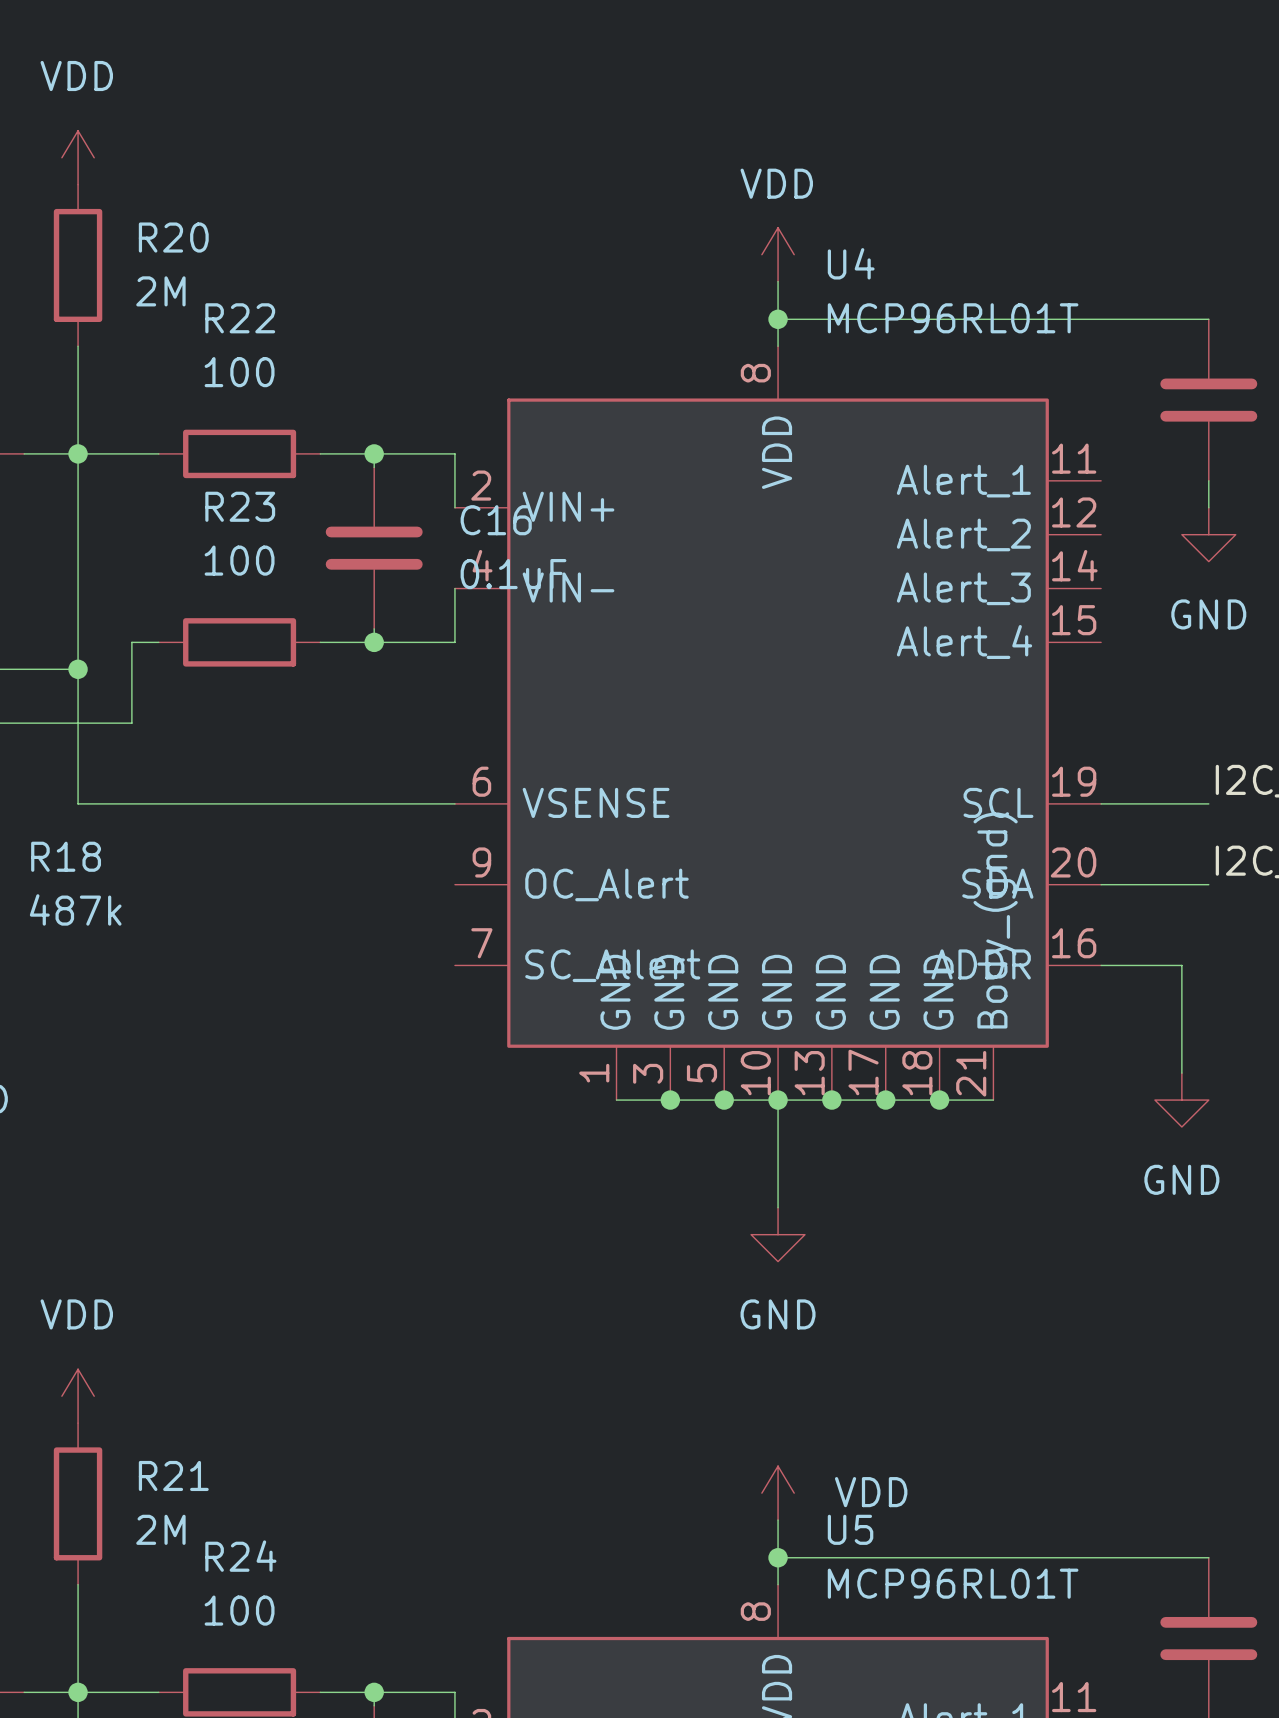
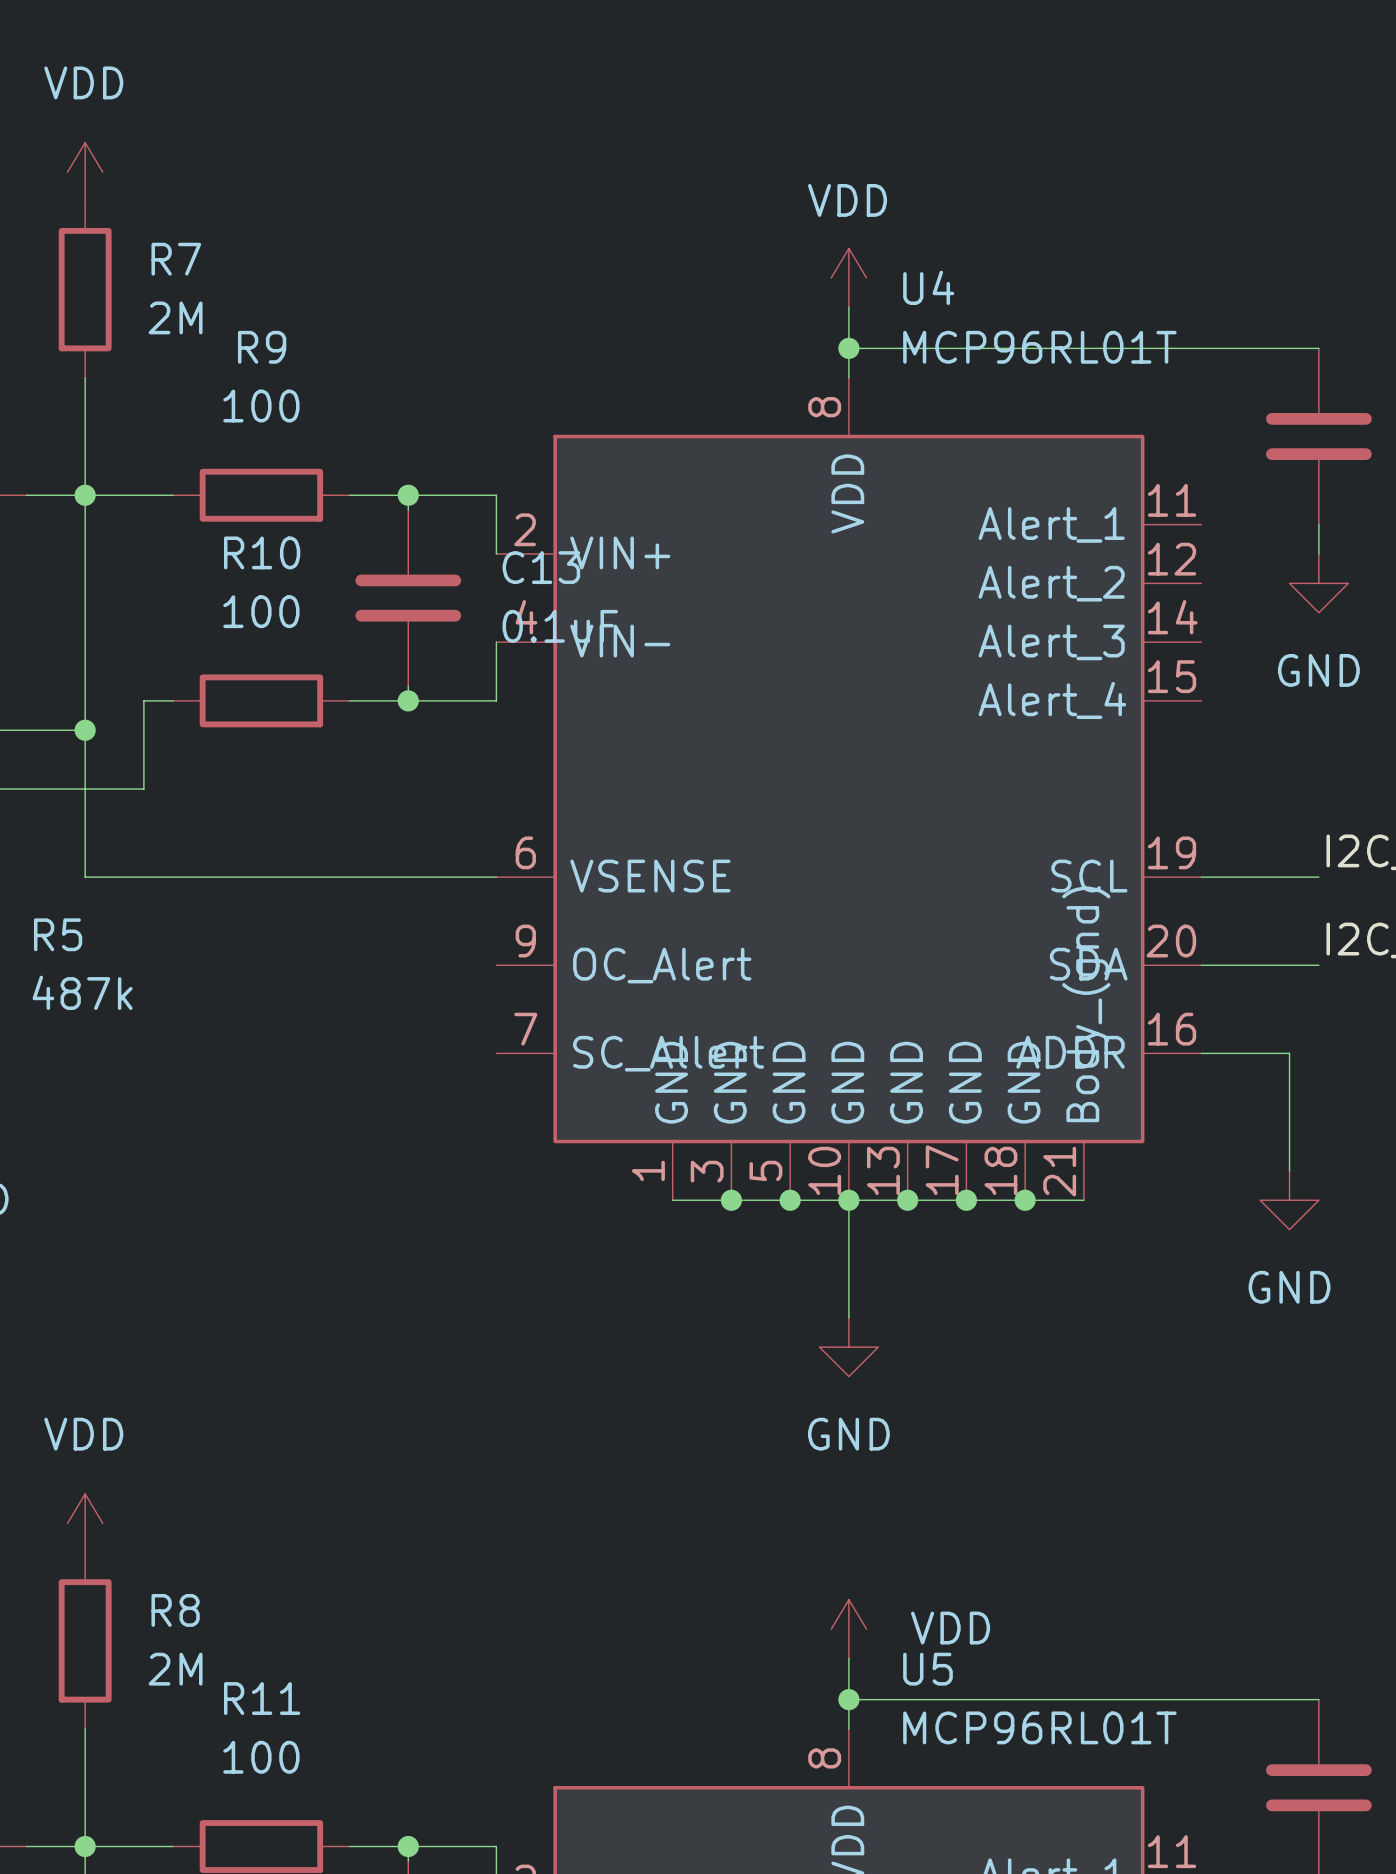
R20 name: R20 (173, 237) -> R7 (176, 259)
R22 name: R22 (240, 318) -> R9 (262, 347)
R23 name: R23 (240, 506) -> R10 (262, 552)
C16 name: C16 (496, 520) -> C13 (541, 567)
R18 name: R18 (66, 856) -> R5 (58, 934)
R21 name: R21 (173, 1475) -> R8 (175, 1610)
R24 name: R24 (240, 1556) -> R11 (262, 1698)

